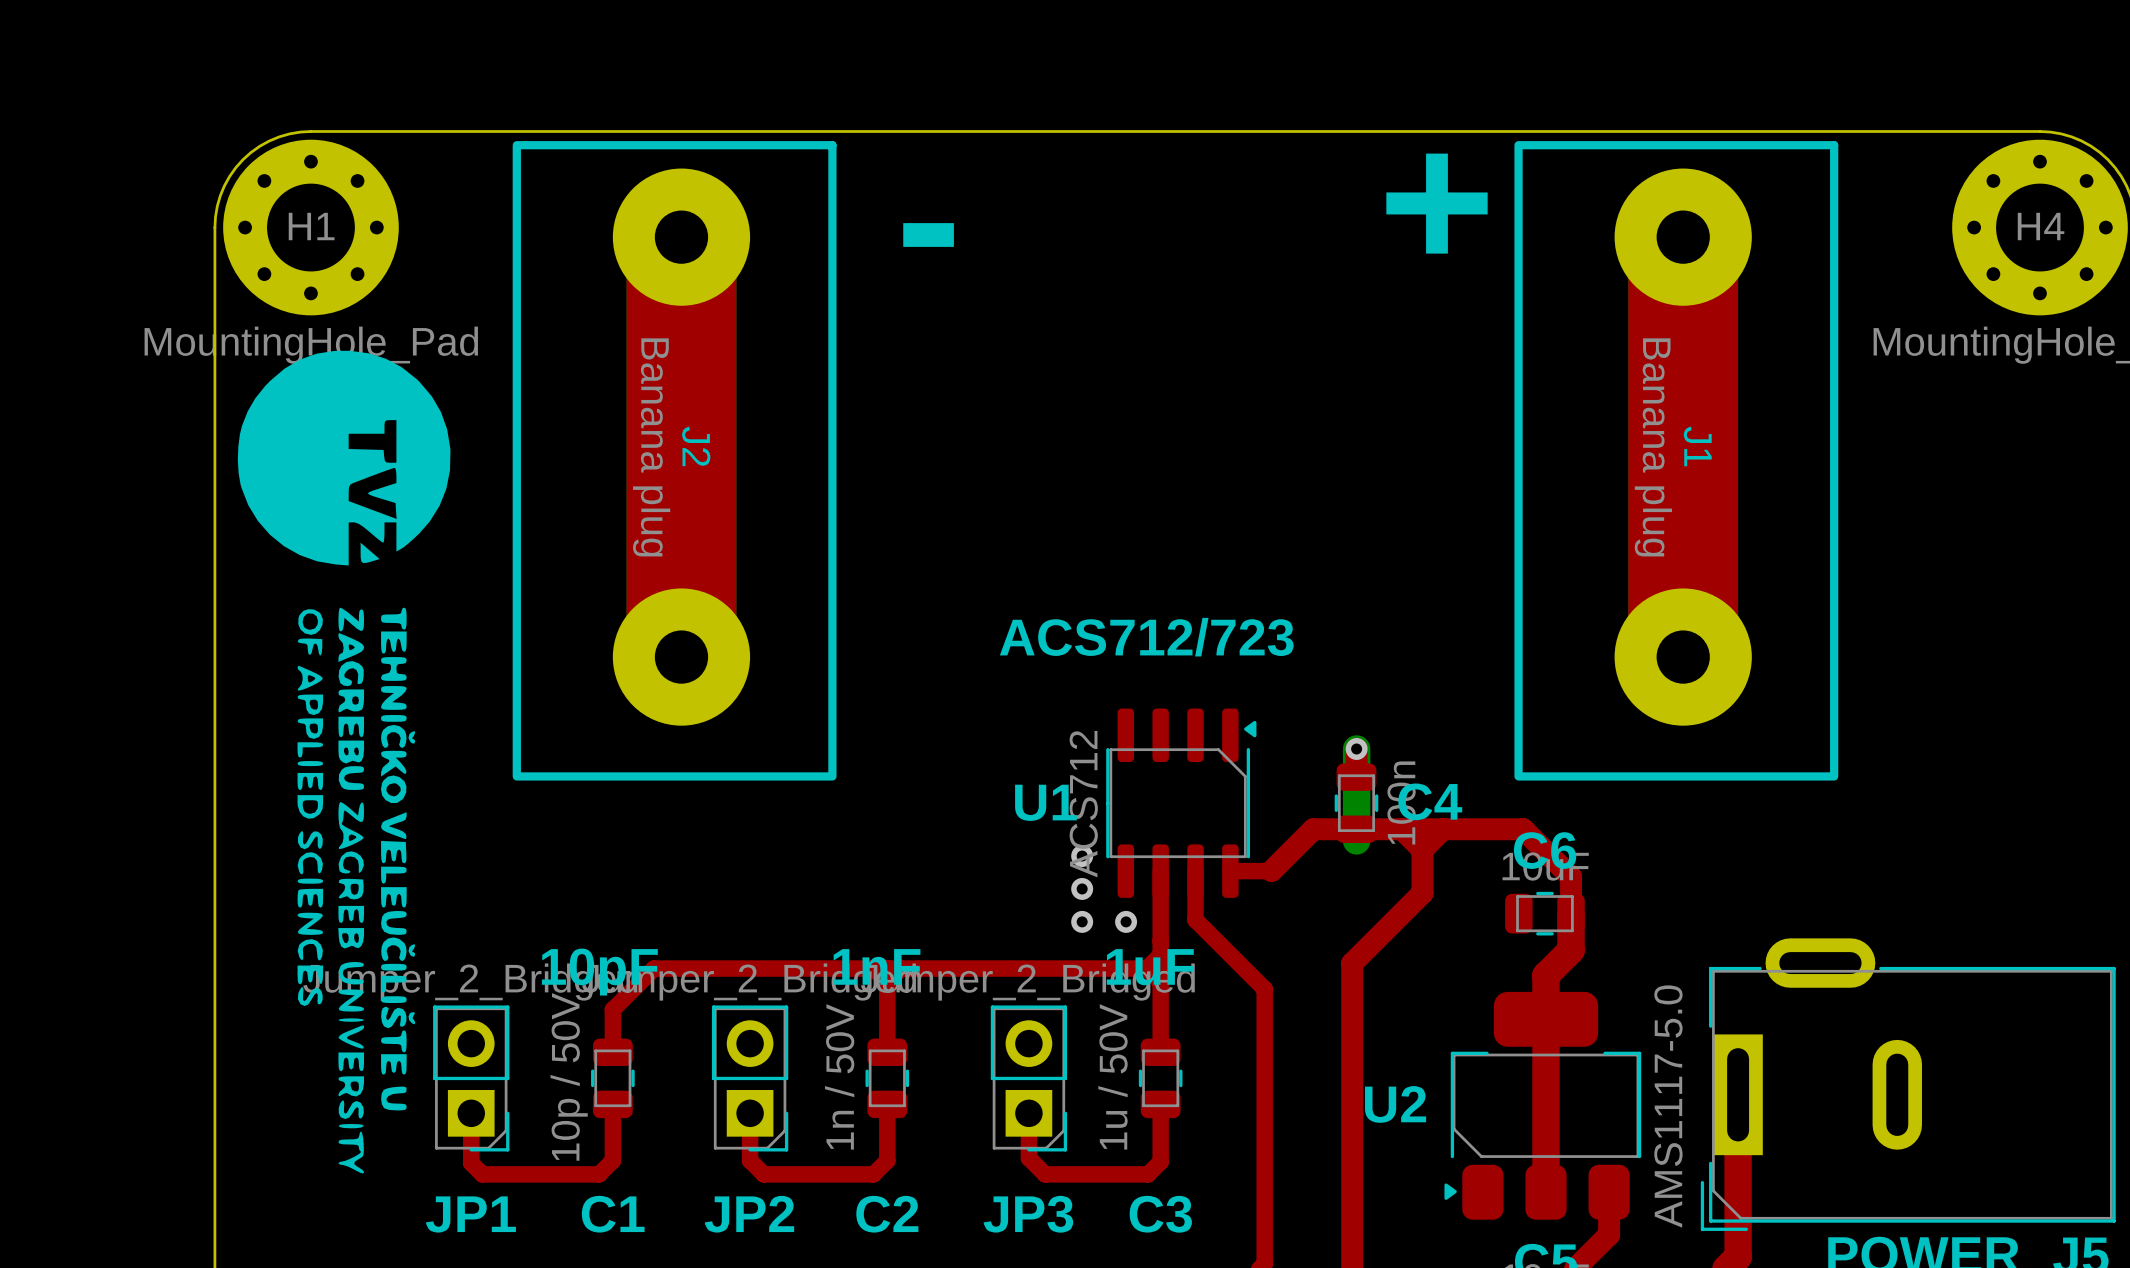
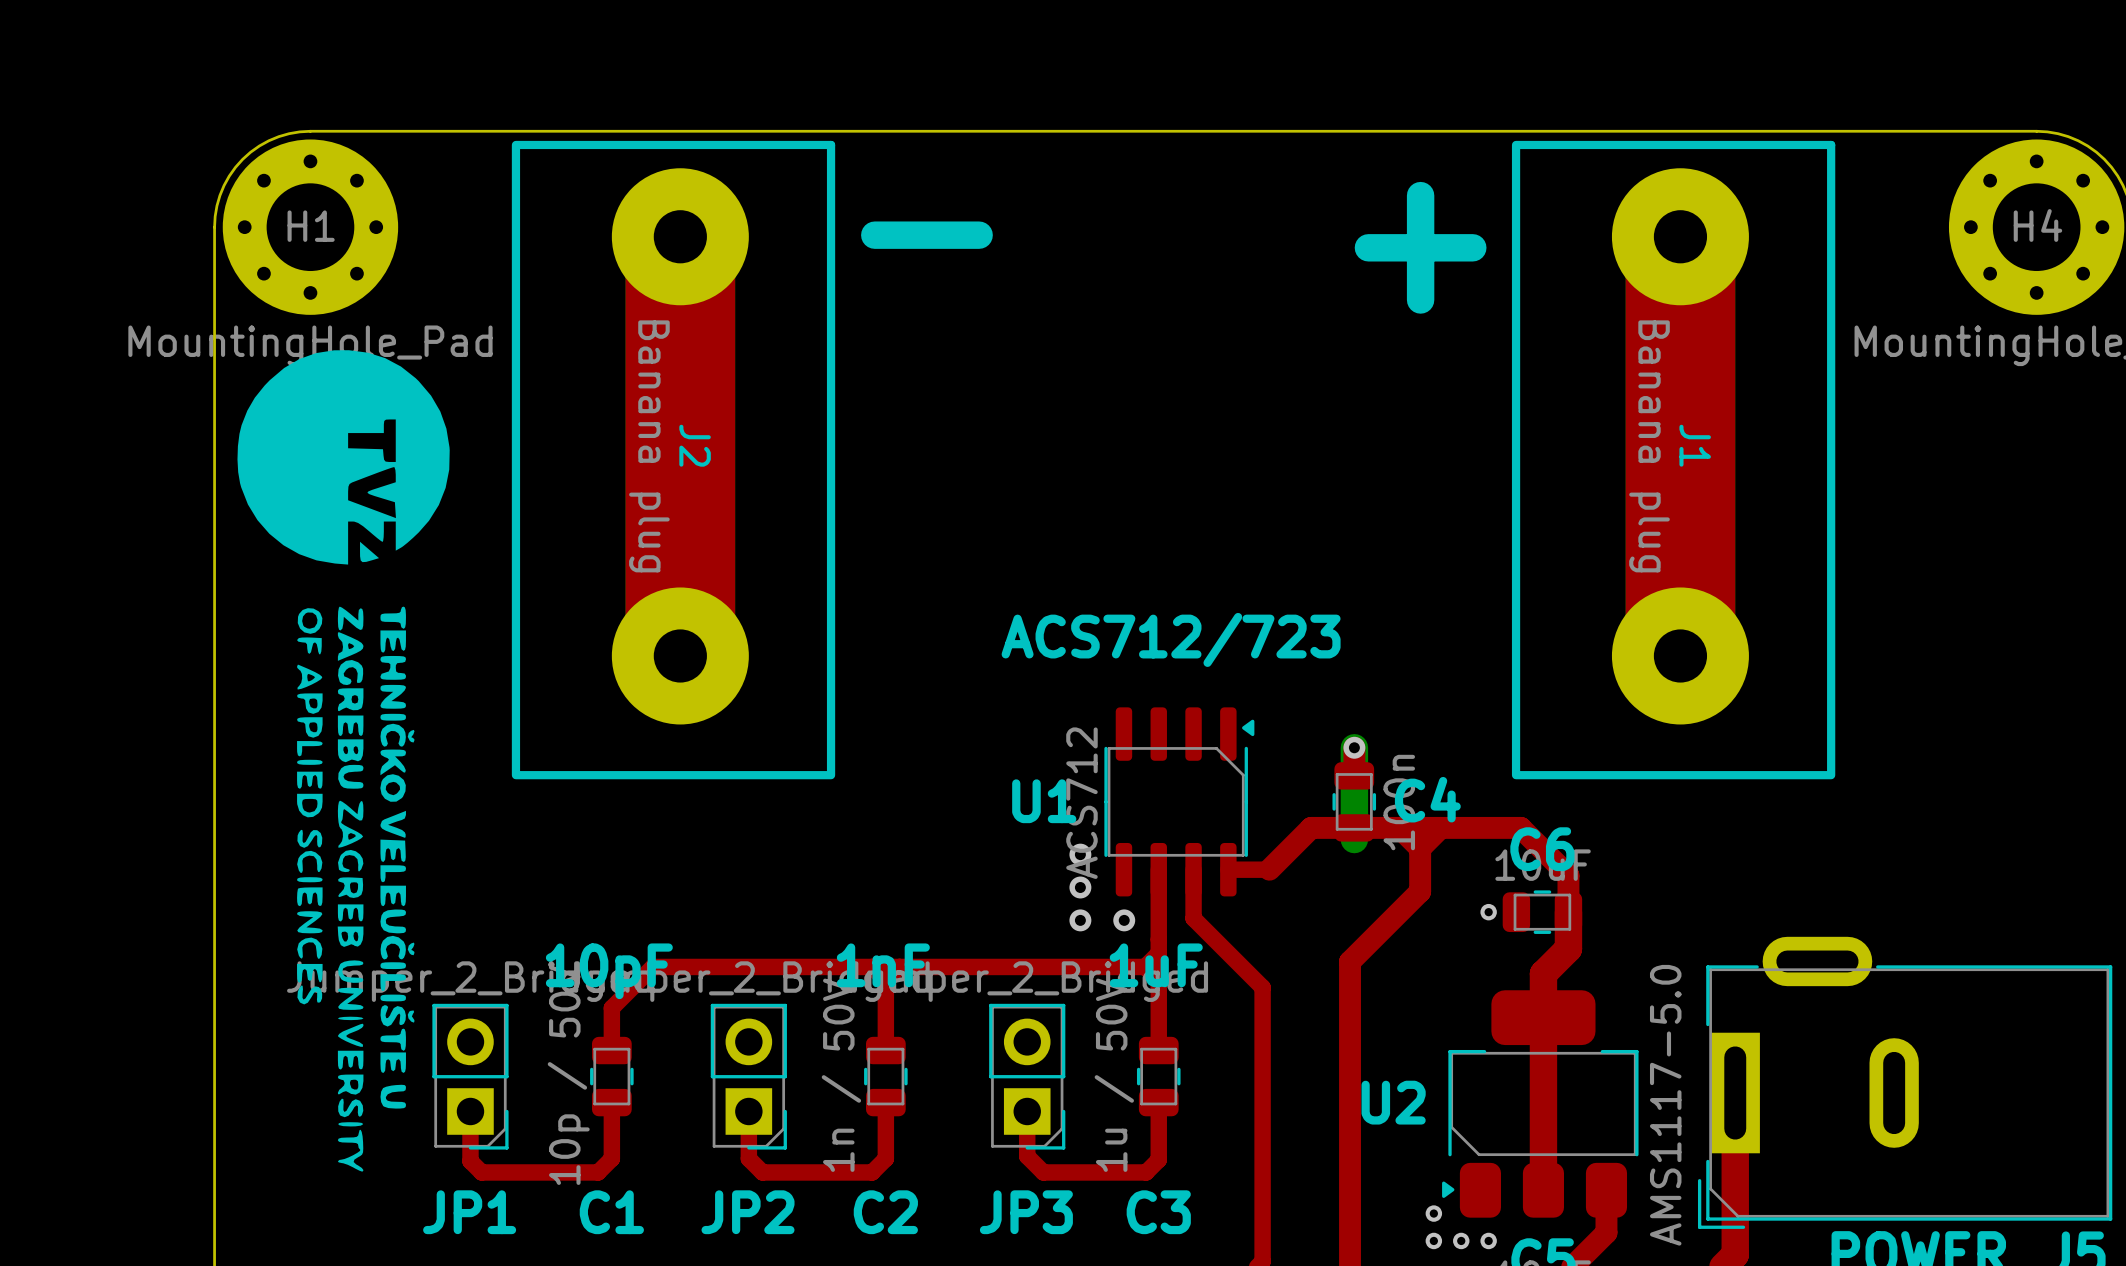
via: none -> (1488, 912)
via: none -> (1433, 1213)
via: none -> (1433, 1240)
via: none -> (1461, 1240)
via: none -> (1488, 1240)

